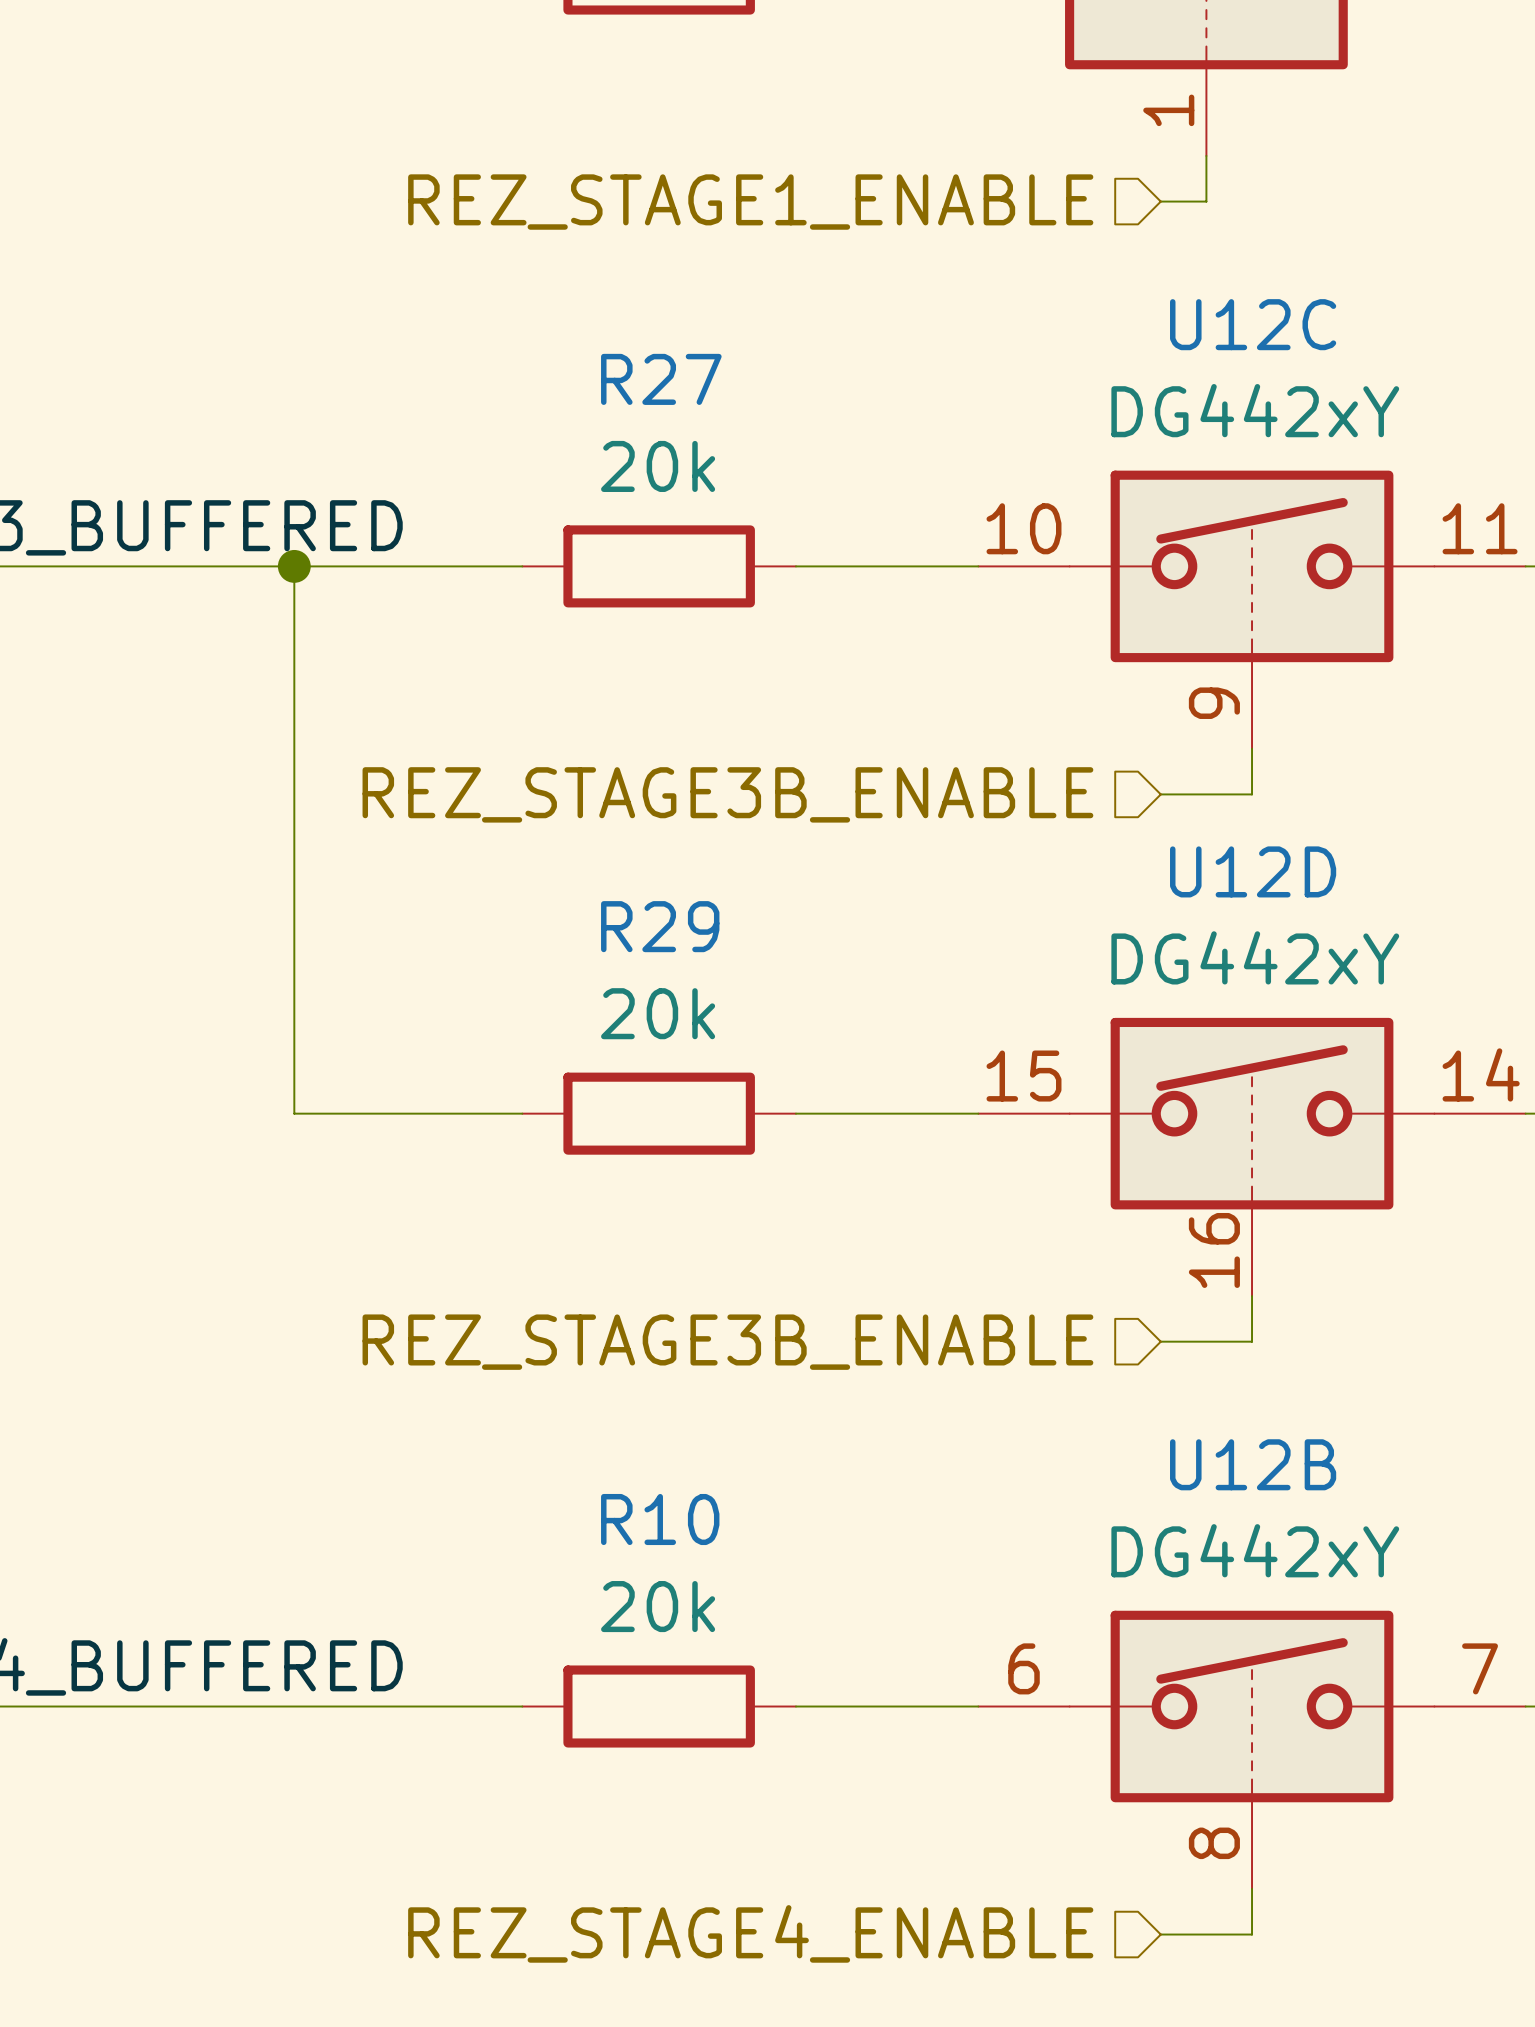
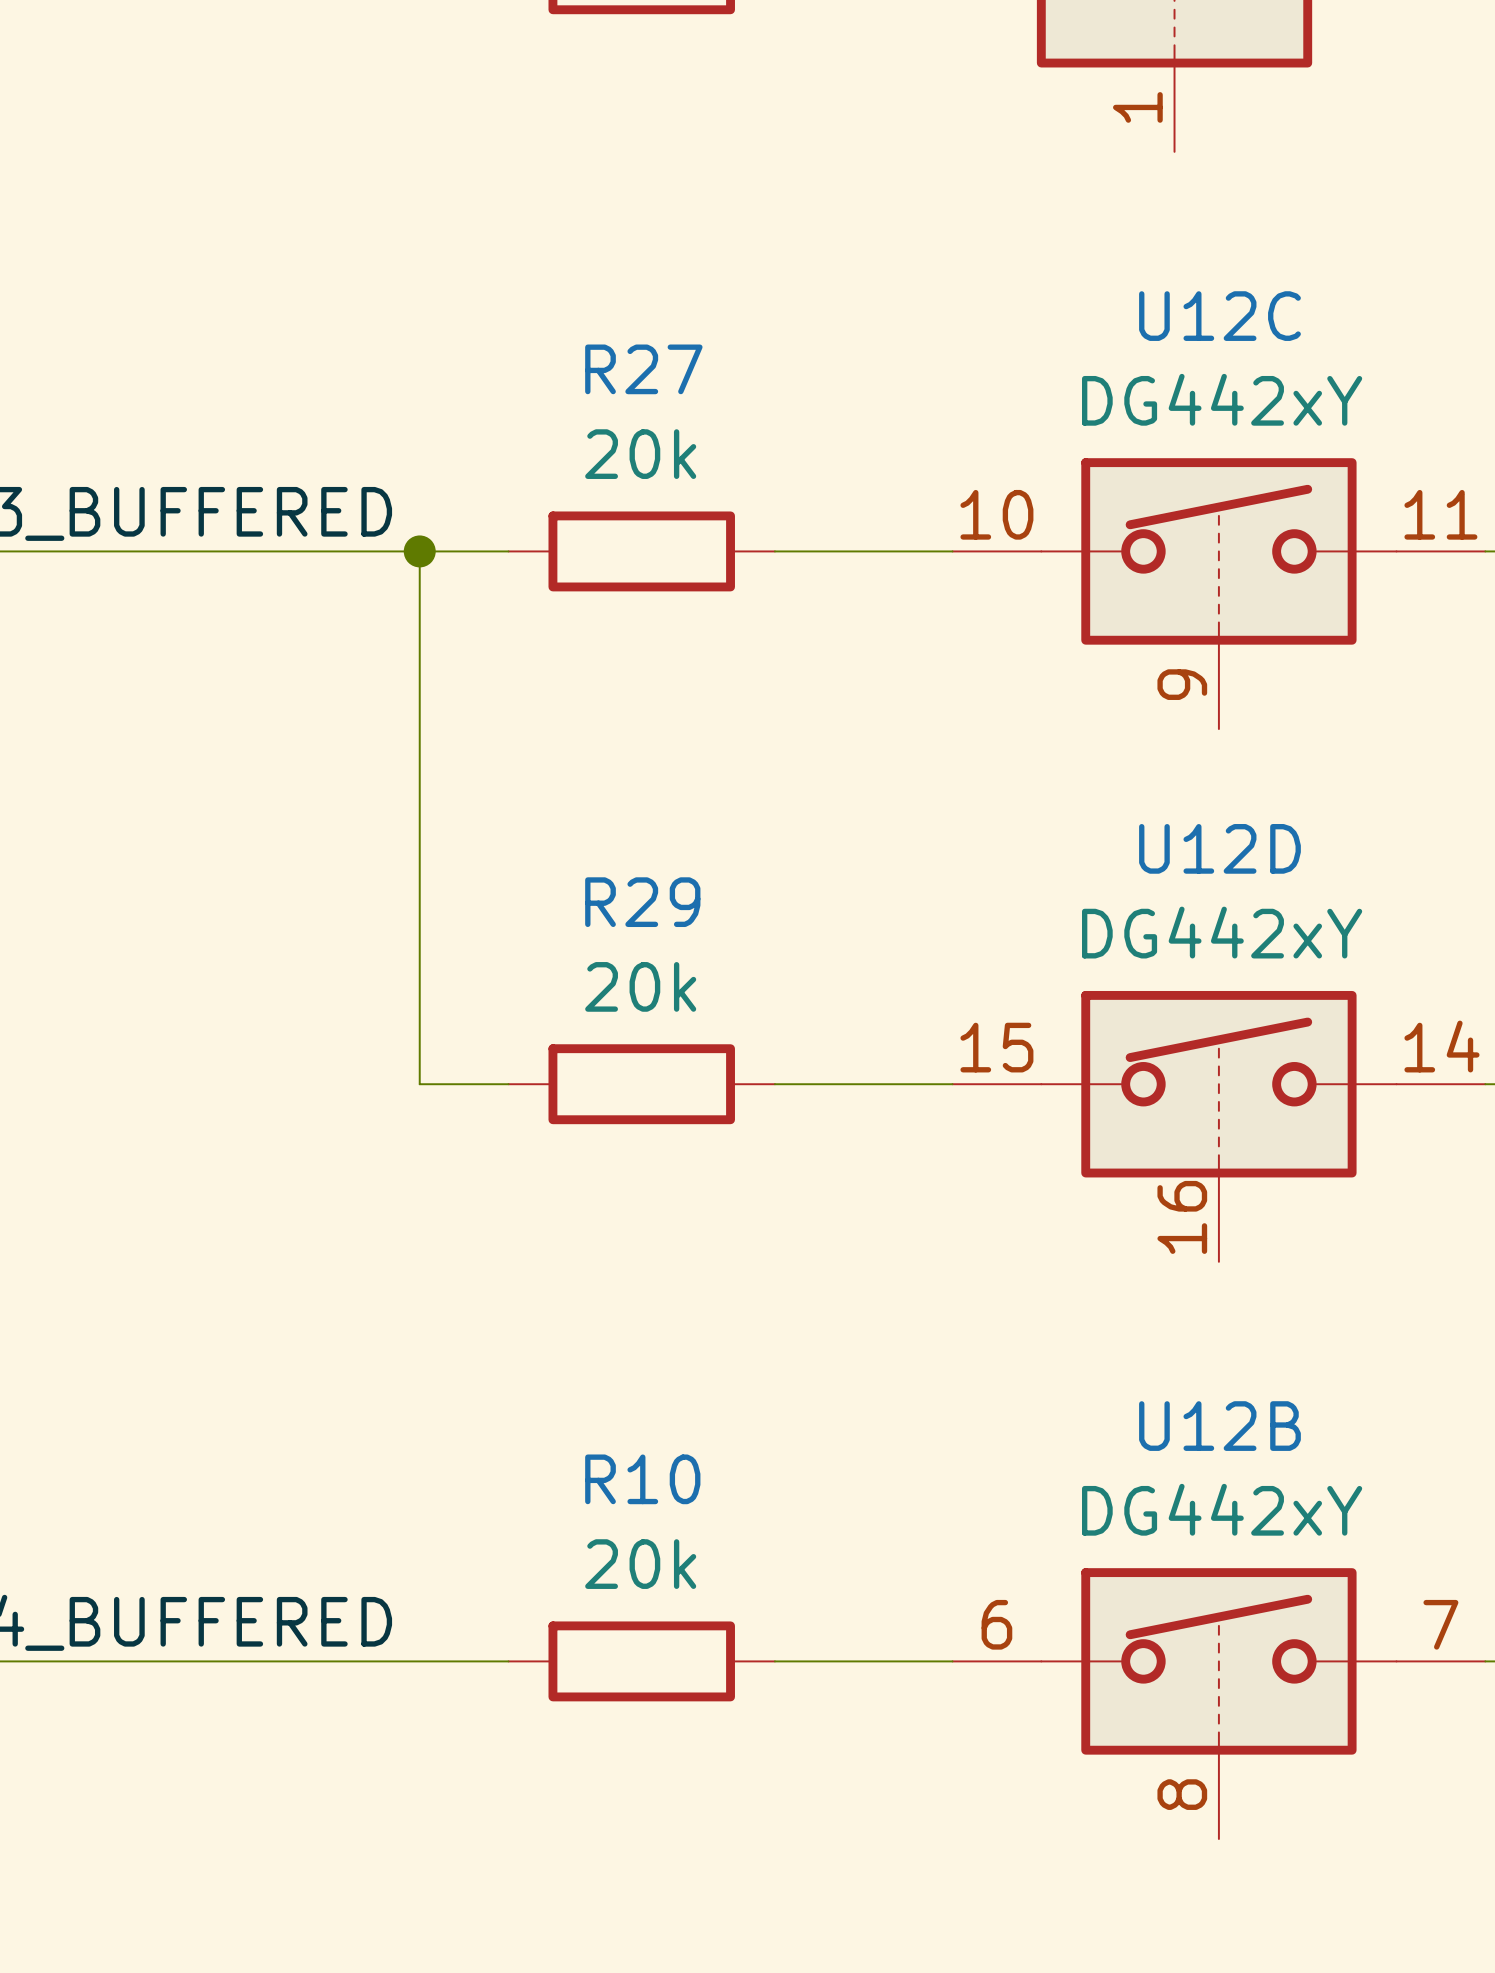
wire: (1206, 155) (1206, 201) (1160, 201) -> none
hierarchical label: REZ_STAGE1_ENABLE (750, 202) -> none
wire: (294, 566) (294, 1113) (431, 1113) -> (419, 551) (419, 1084)
junction position: (294, 566) -> (419, 551)
wire: (1252, 748) (1252, 794) (1160, 794) -> none
hierarchical label: REZ_STAGE3B_ENABLE (727, 794) -> none
wire: (1252, 1296) (1252, 1341) (1160, 1341) -> none
hierarchical label: REZ_STAGE3B_ENABLE (727, 1342) -> none
wire: (1252, 1888) (1252, 1934) (1160, 1934) -> none
hierarchical label: REZ_STAGE4_ENABLE (750, 1933) -> none

